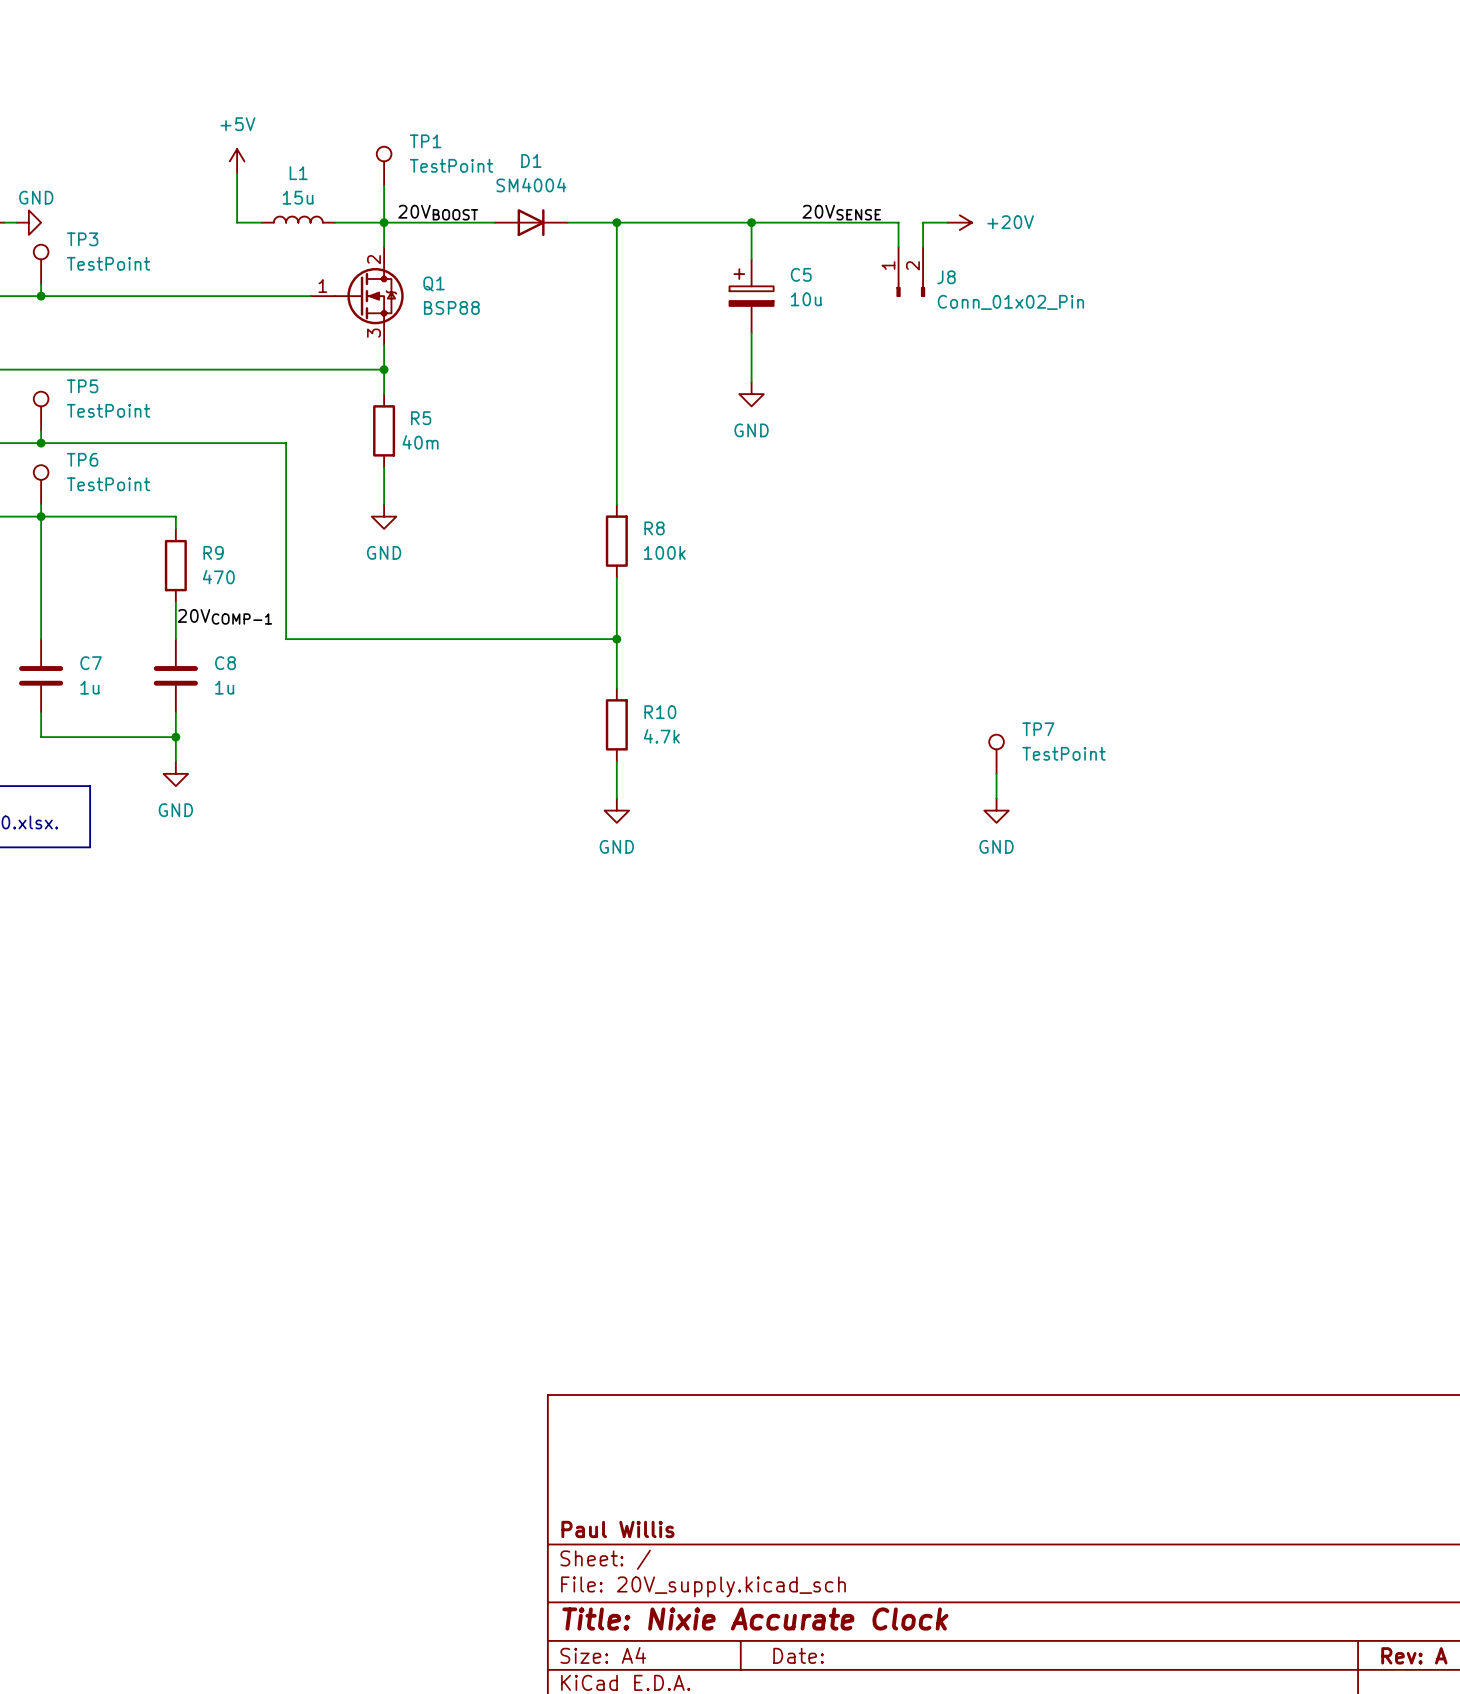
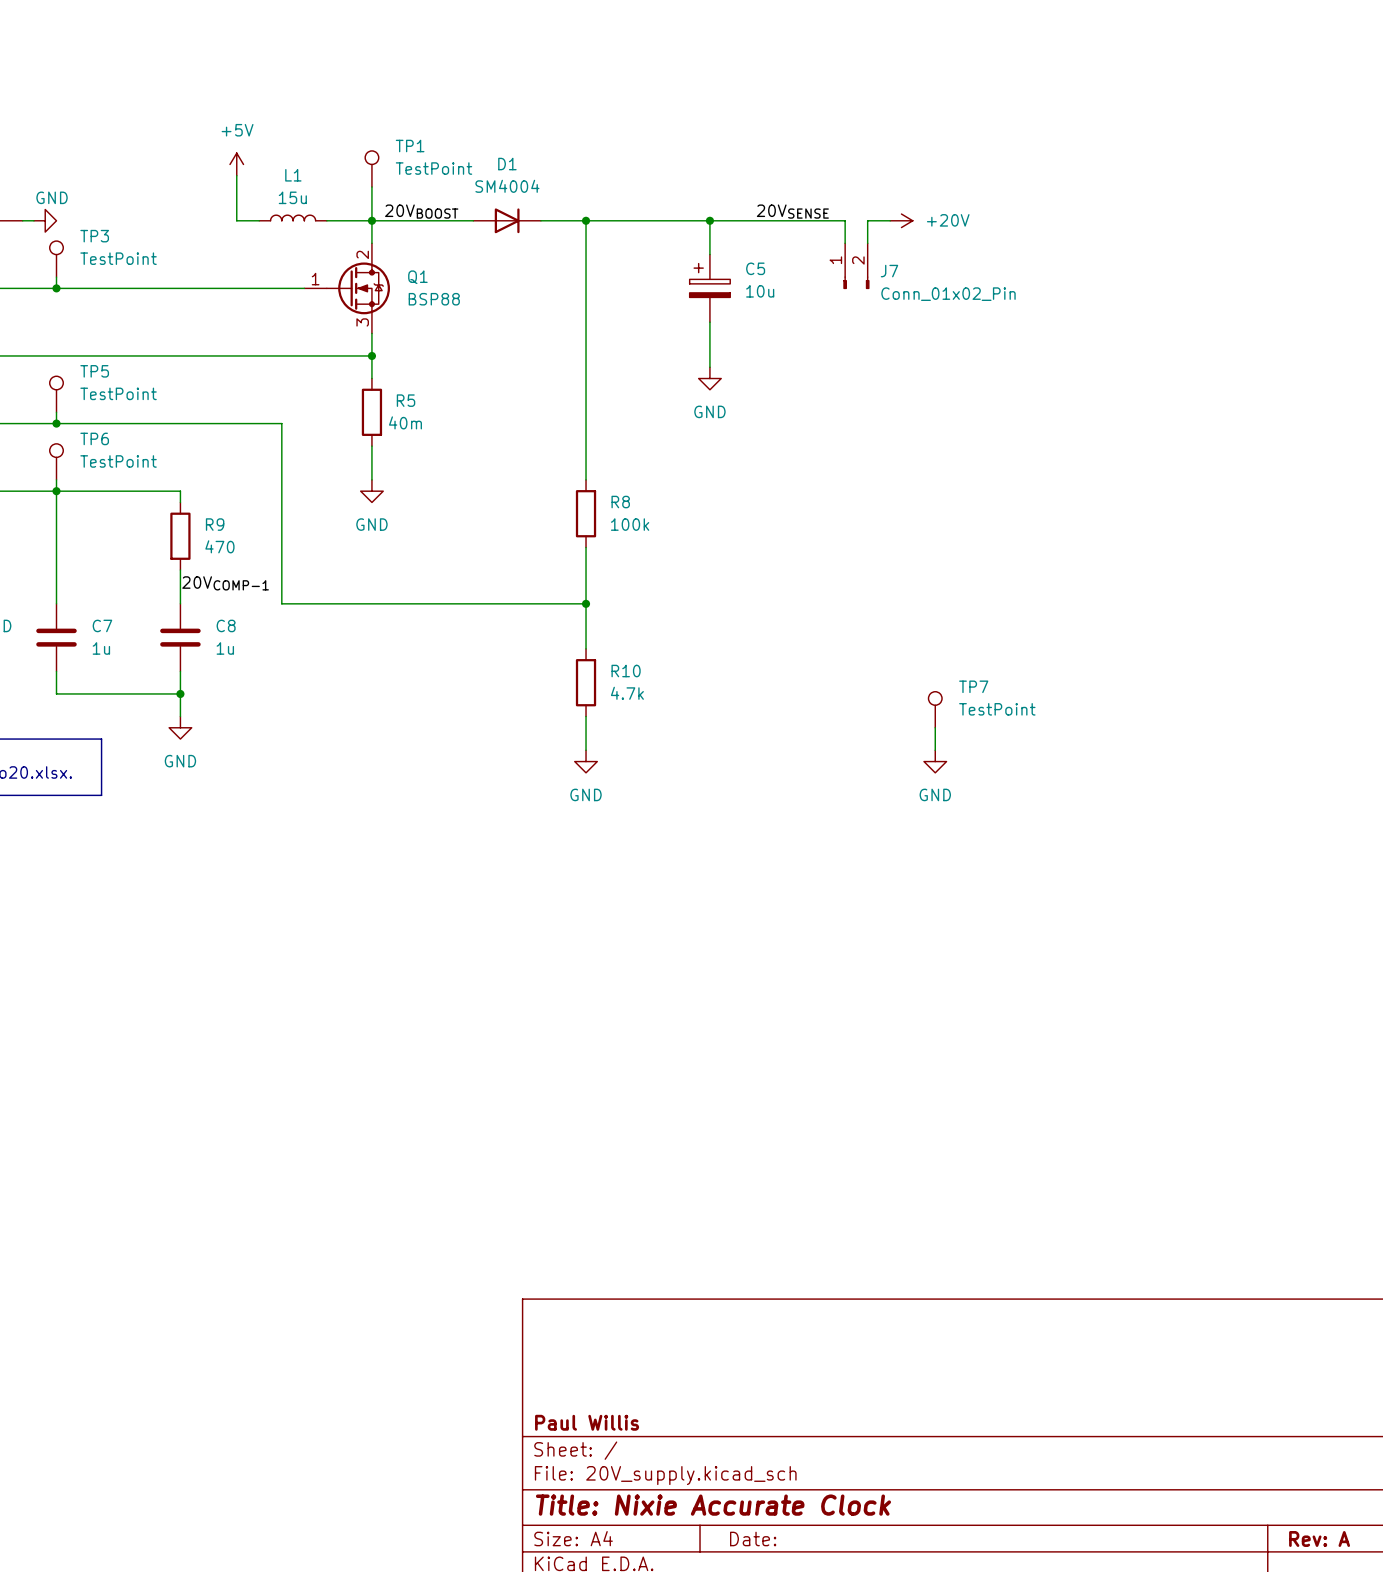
J8 name: J8 (946, 277) -> J7 (889, 271)

